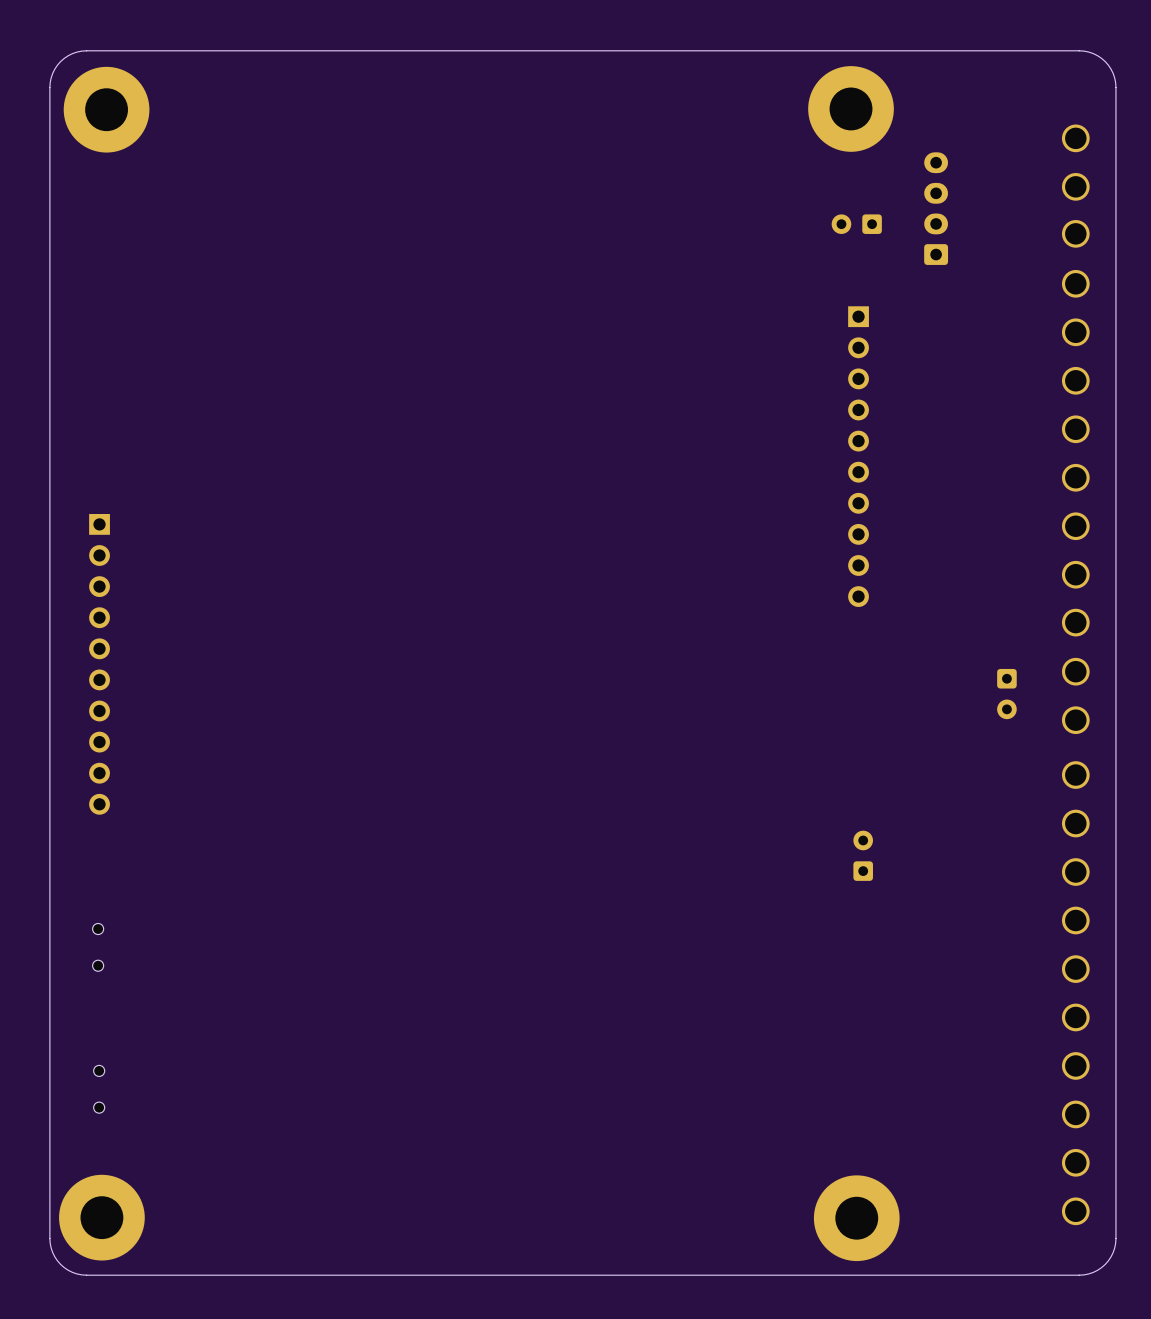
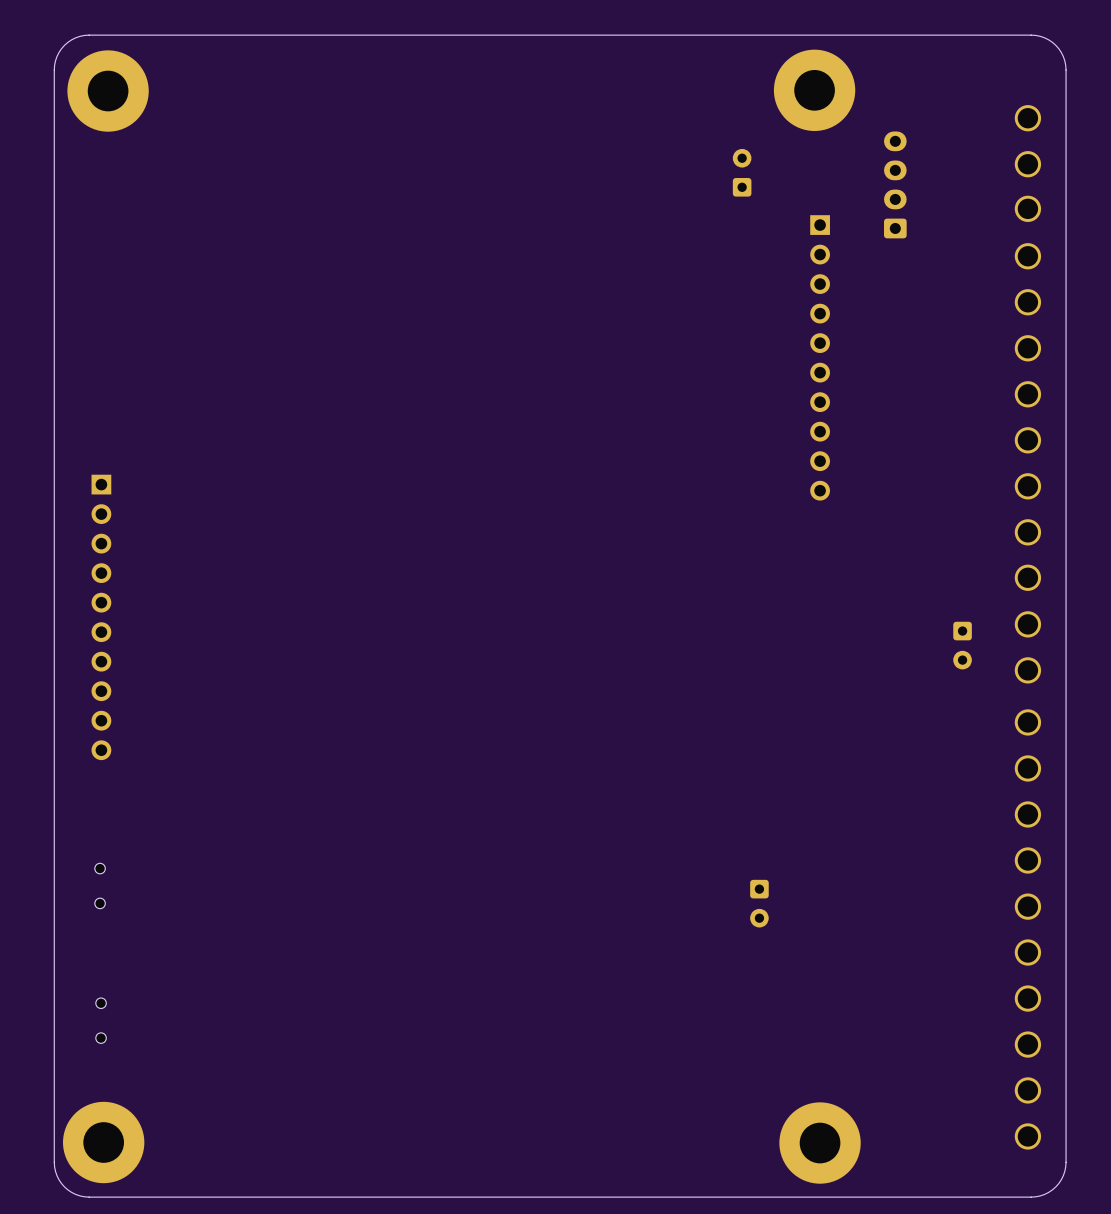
part rotation: 0° (856, 224) -> 90° clockwise (742, 172)
part position: (856, 224) -> (742, 172)
part position: (858, 456) -> (820, 357)
part rotation: 0° (863, 855) -> 180° (759, 903)
part position: (863, 855) -> (759, 903)

